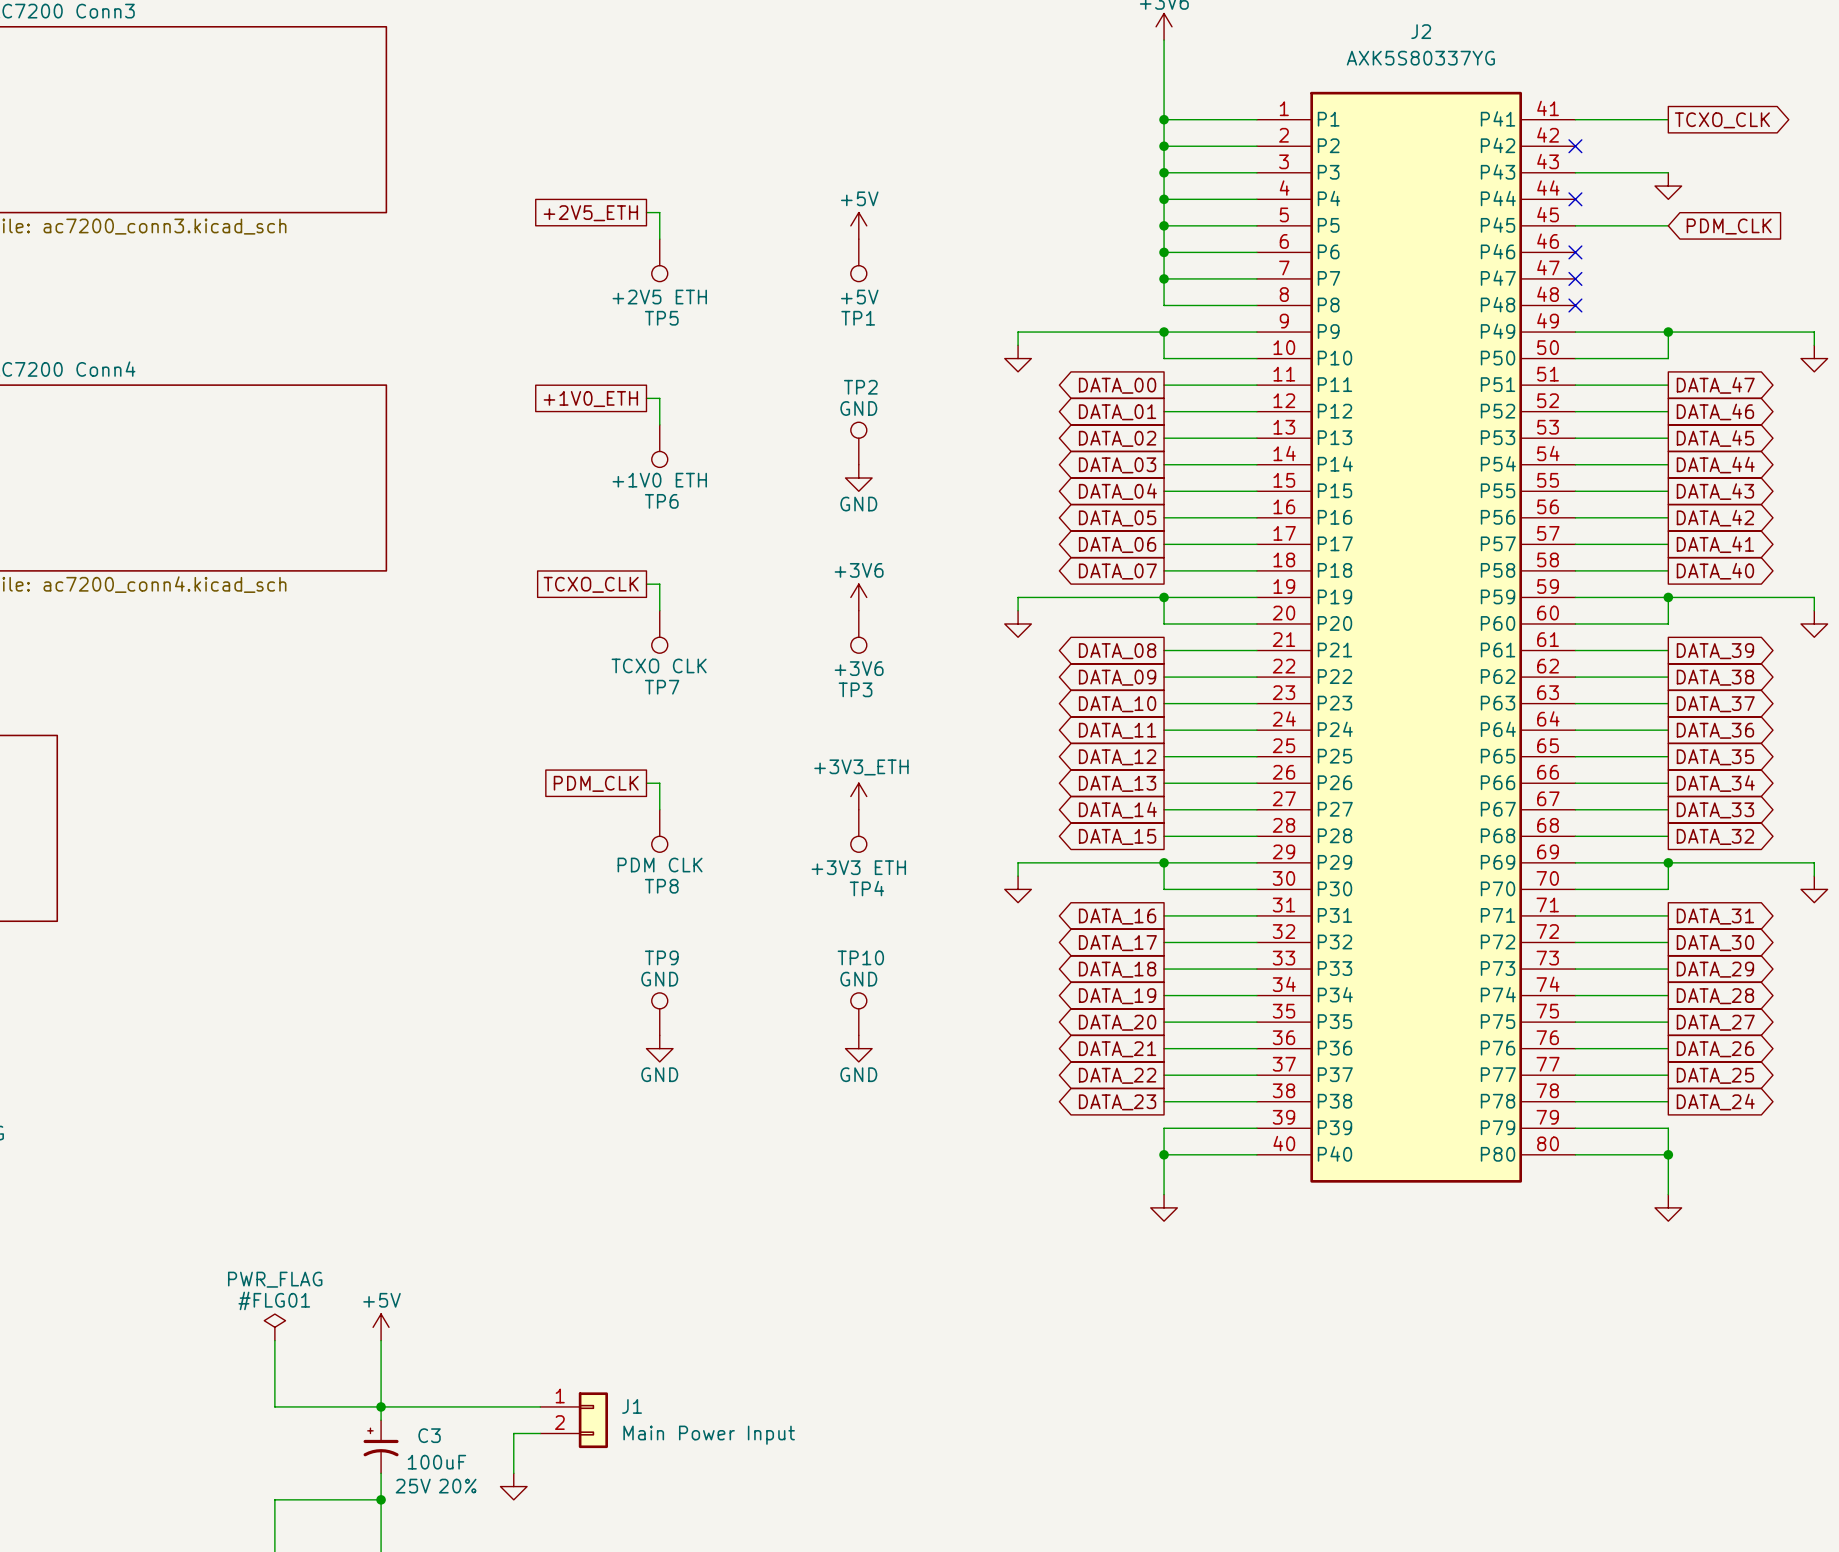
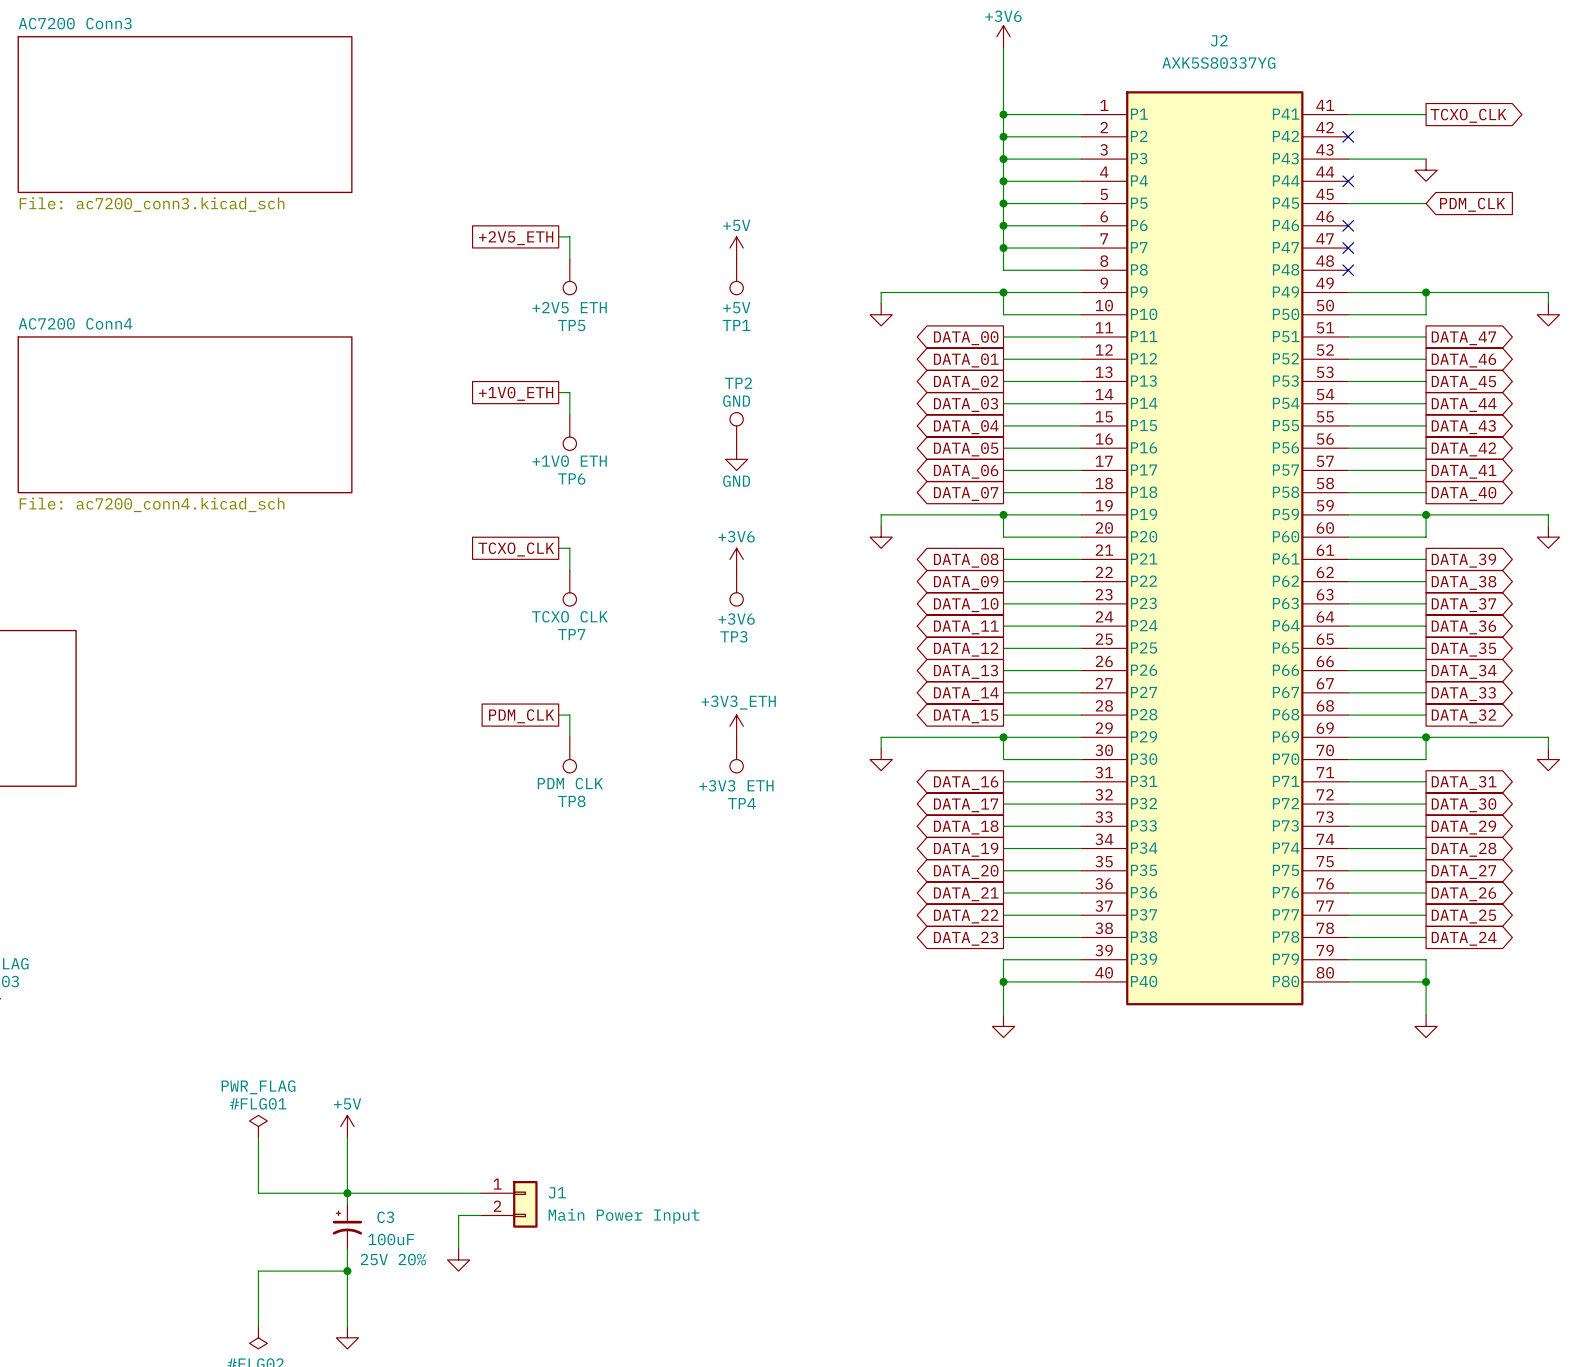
wire: (646, 212) (659, 212) (659, 239) -> (558, 236) (569, 236) (569, 259)
global label position: +2V5_ETH (590, 213) -> +2V5_ETH (516, 238)
power symbol position: +5V (858, 225) -> +5V (736, 248)
TP5 position: (659, 260) -> (569, 276)
TP1 position: (858, 260) -> (736, 276)
wire: (646, 398) (659, 398) (659, 424) -> (558, 392) (569, 392) (569, 414)
global label position: +1V0_ETH (590, 399) -> +1V0_ETH (516, 393)
TP2 position: (858, 443) -> (736, 430)
TP6 position: (659, 446) -> (569, 432)
power symbol position: GND (858, 478) -> GND (736, 459)
global label position: TCXO_CLK (591, 584) -> TCXO_CLK (516, 549)
wire: (646, 584) (659, 584) (659, 610) -> (558, 548) (569, 548) (569, 570)
power symbol position: +3V6 (858, 597) -> +3V6 (736, 559)
TP7 position: (659, 631) -> (569, 588)
TP3 position: (858, 631) -> (736, 588)
global label position: PDM_CLK (596, 783) -> PDM_CLK (521, 716)
wire: (646, 783) (659, 783) (659, 809) -> (558, 715) (569, 715) (569, 737)
power symbol position: +3V3_ETH (858, 796) -> +3V3_ETH (736, 726)
TP8 position: (659, 831) -> (569, 755)
TP4 position: (858, 831) -> (736, 755)
TP9: GND (659, 1014) -> none
TP10: GND (858, 1014) -> none
power symbol: GND (659, 1048) -> none
power symbol: GND (858, 1048) -> none

